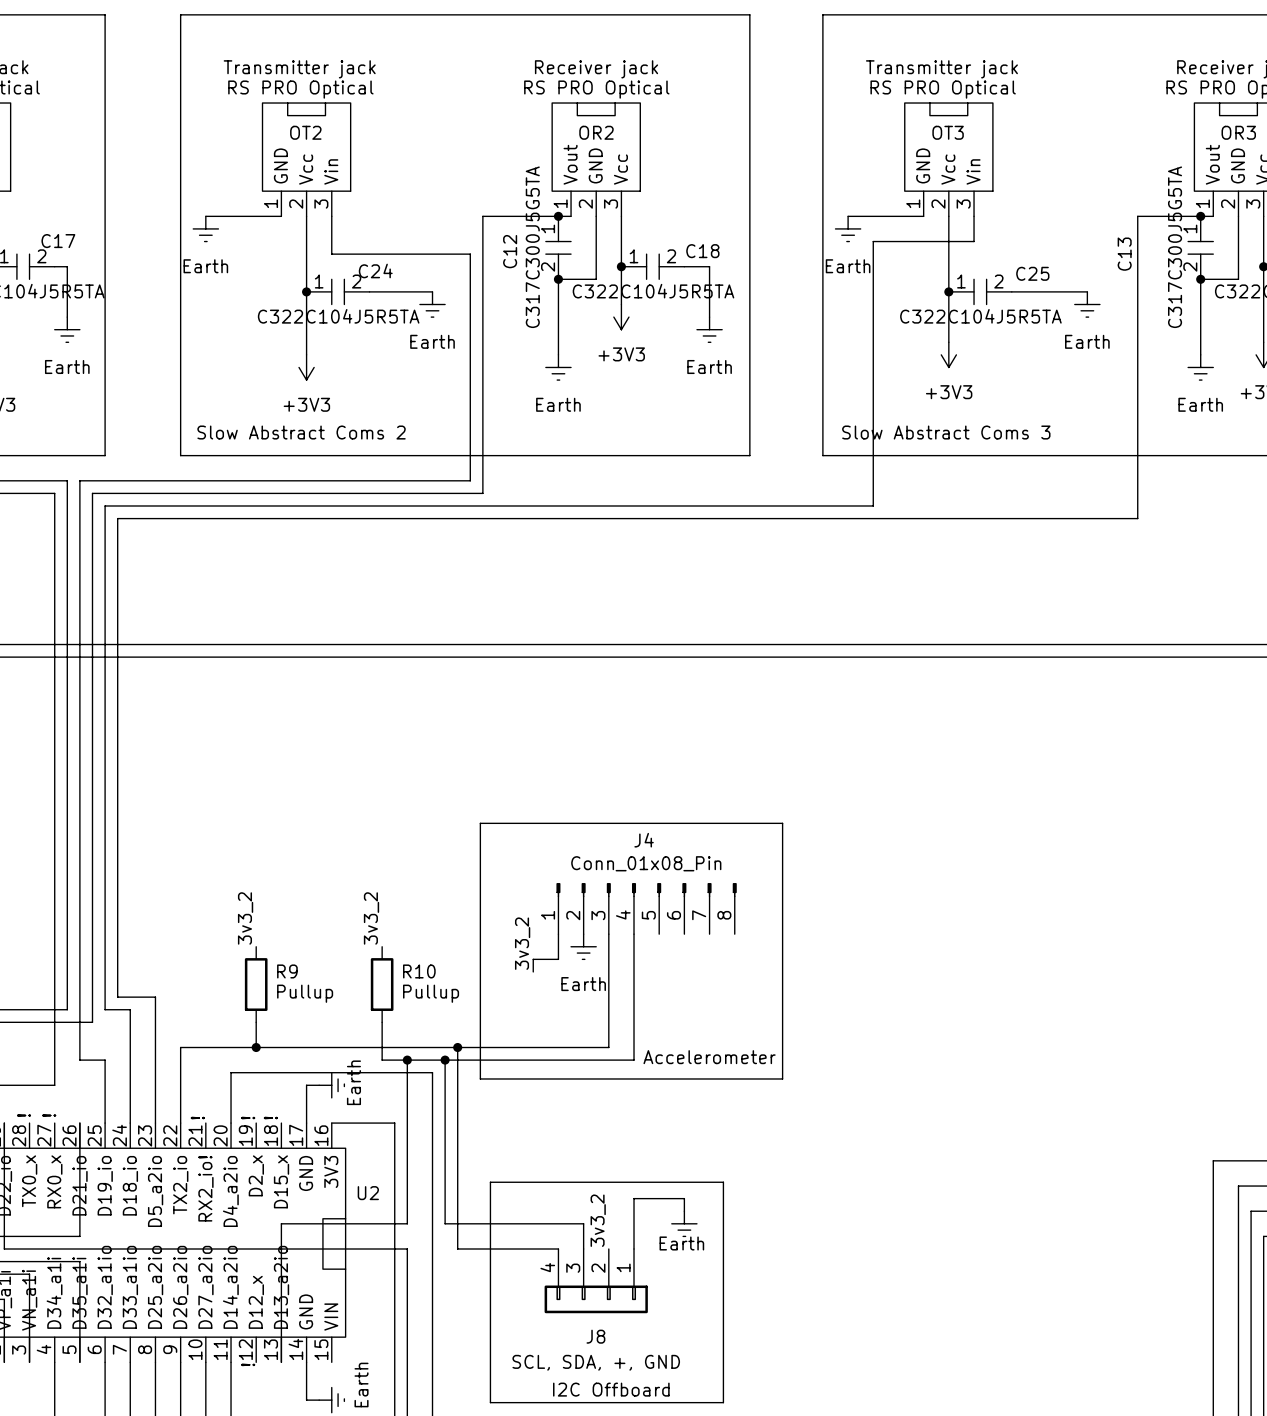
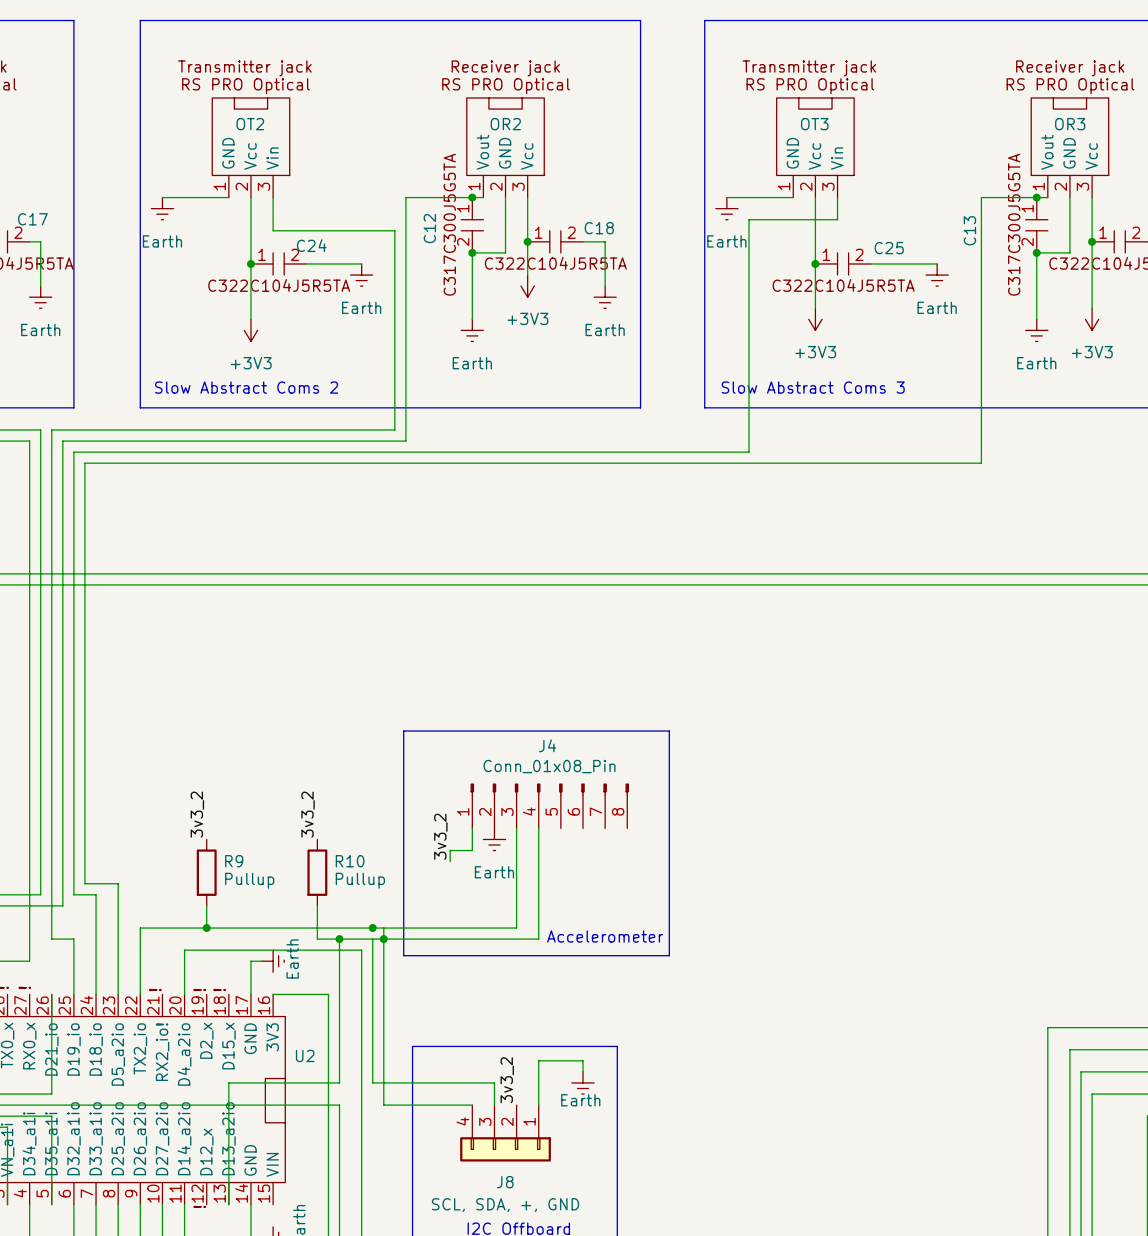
junction: none -> (372, 928)
junction: (457, 1047) -> none
junction: (445, 1060) -> none
junction: none -> (383, 939)

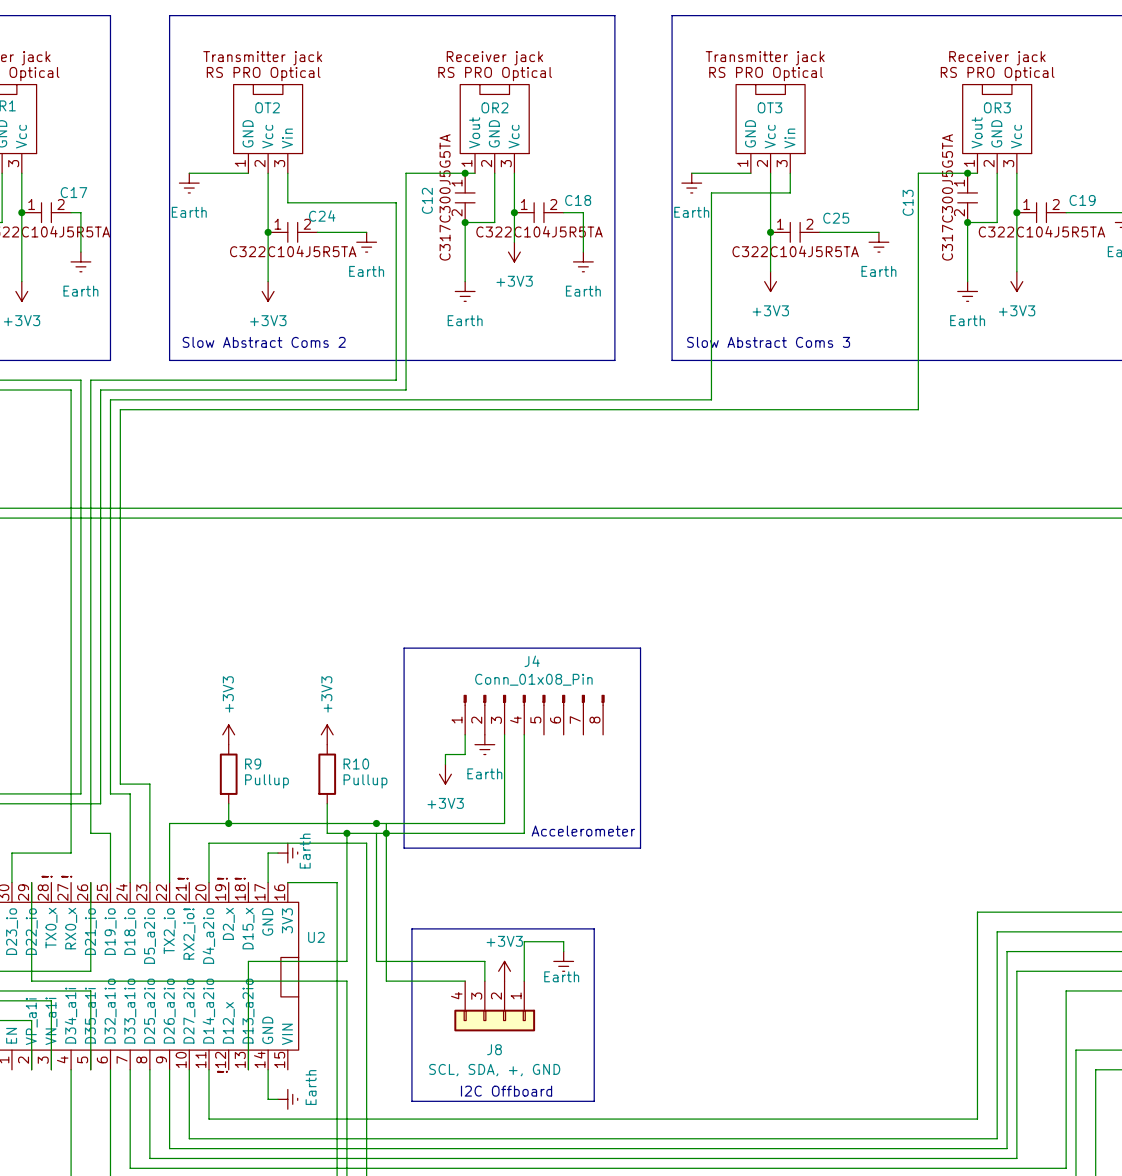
label: 3v3_2 (197, 814) -> none
label: 3v3_2 (308, 814) -> none
power symbol: none -> +3V3 (228, 734)
power symbol: none -> +3V3 (327, 734)
label: 3v3_2 (440, 836) -> none
power symbol: none -> +3V3 (445, 774)
label: 3v3_2 (507, 1080) -> none
power symbol: none -> +3V3 (504, 971)

